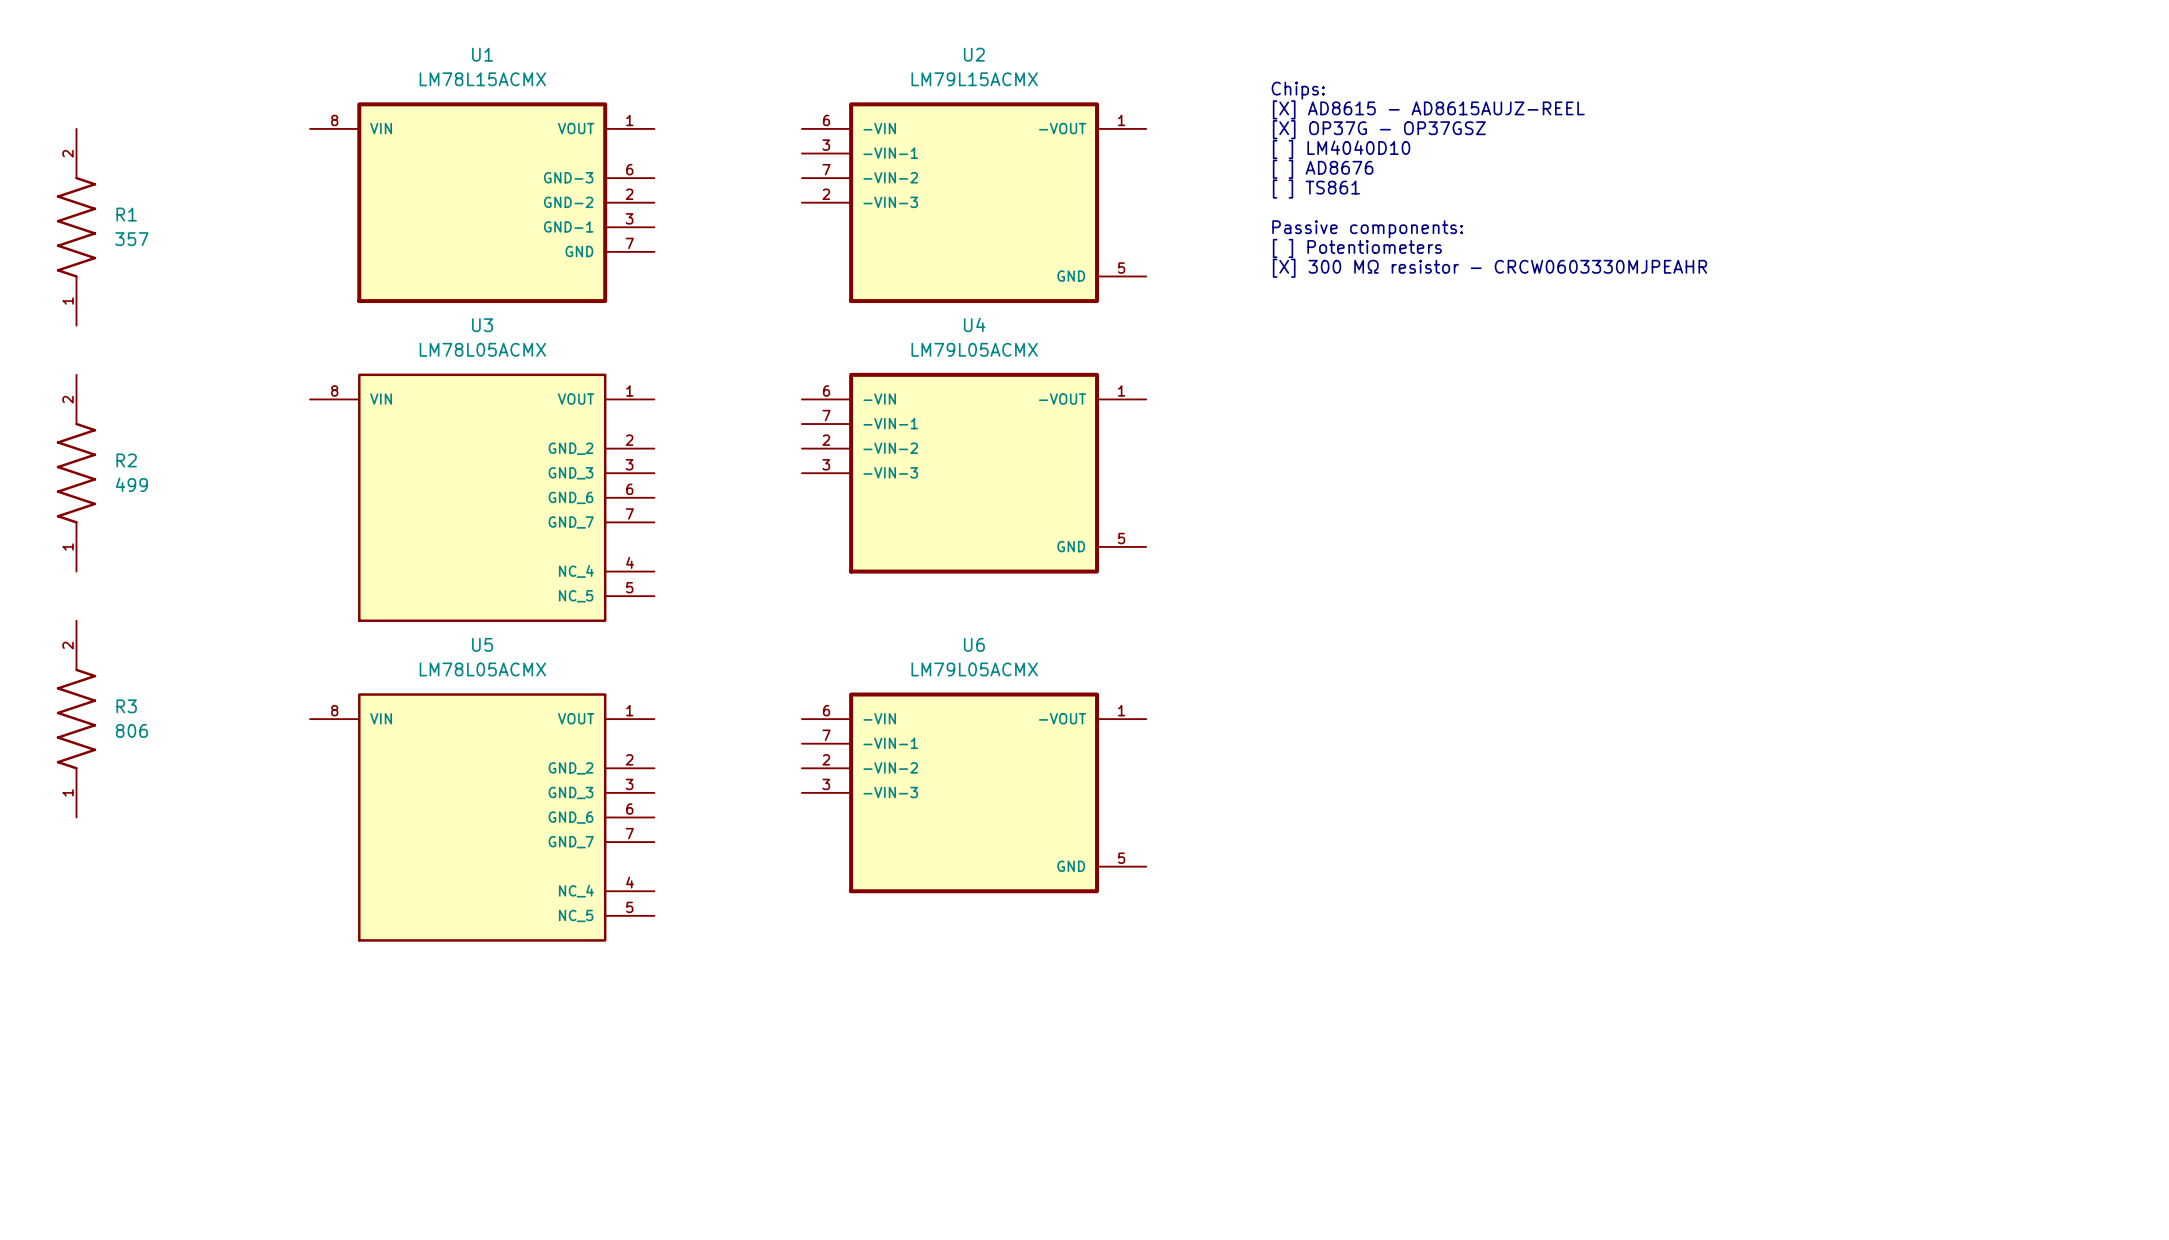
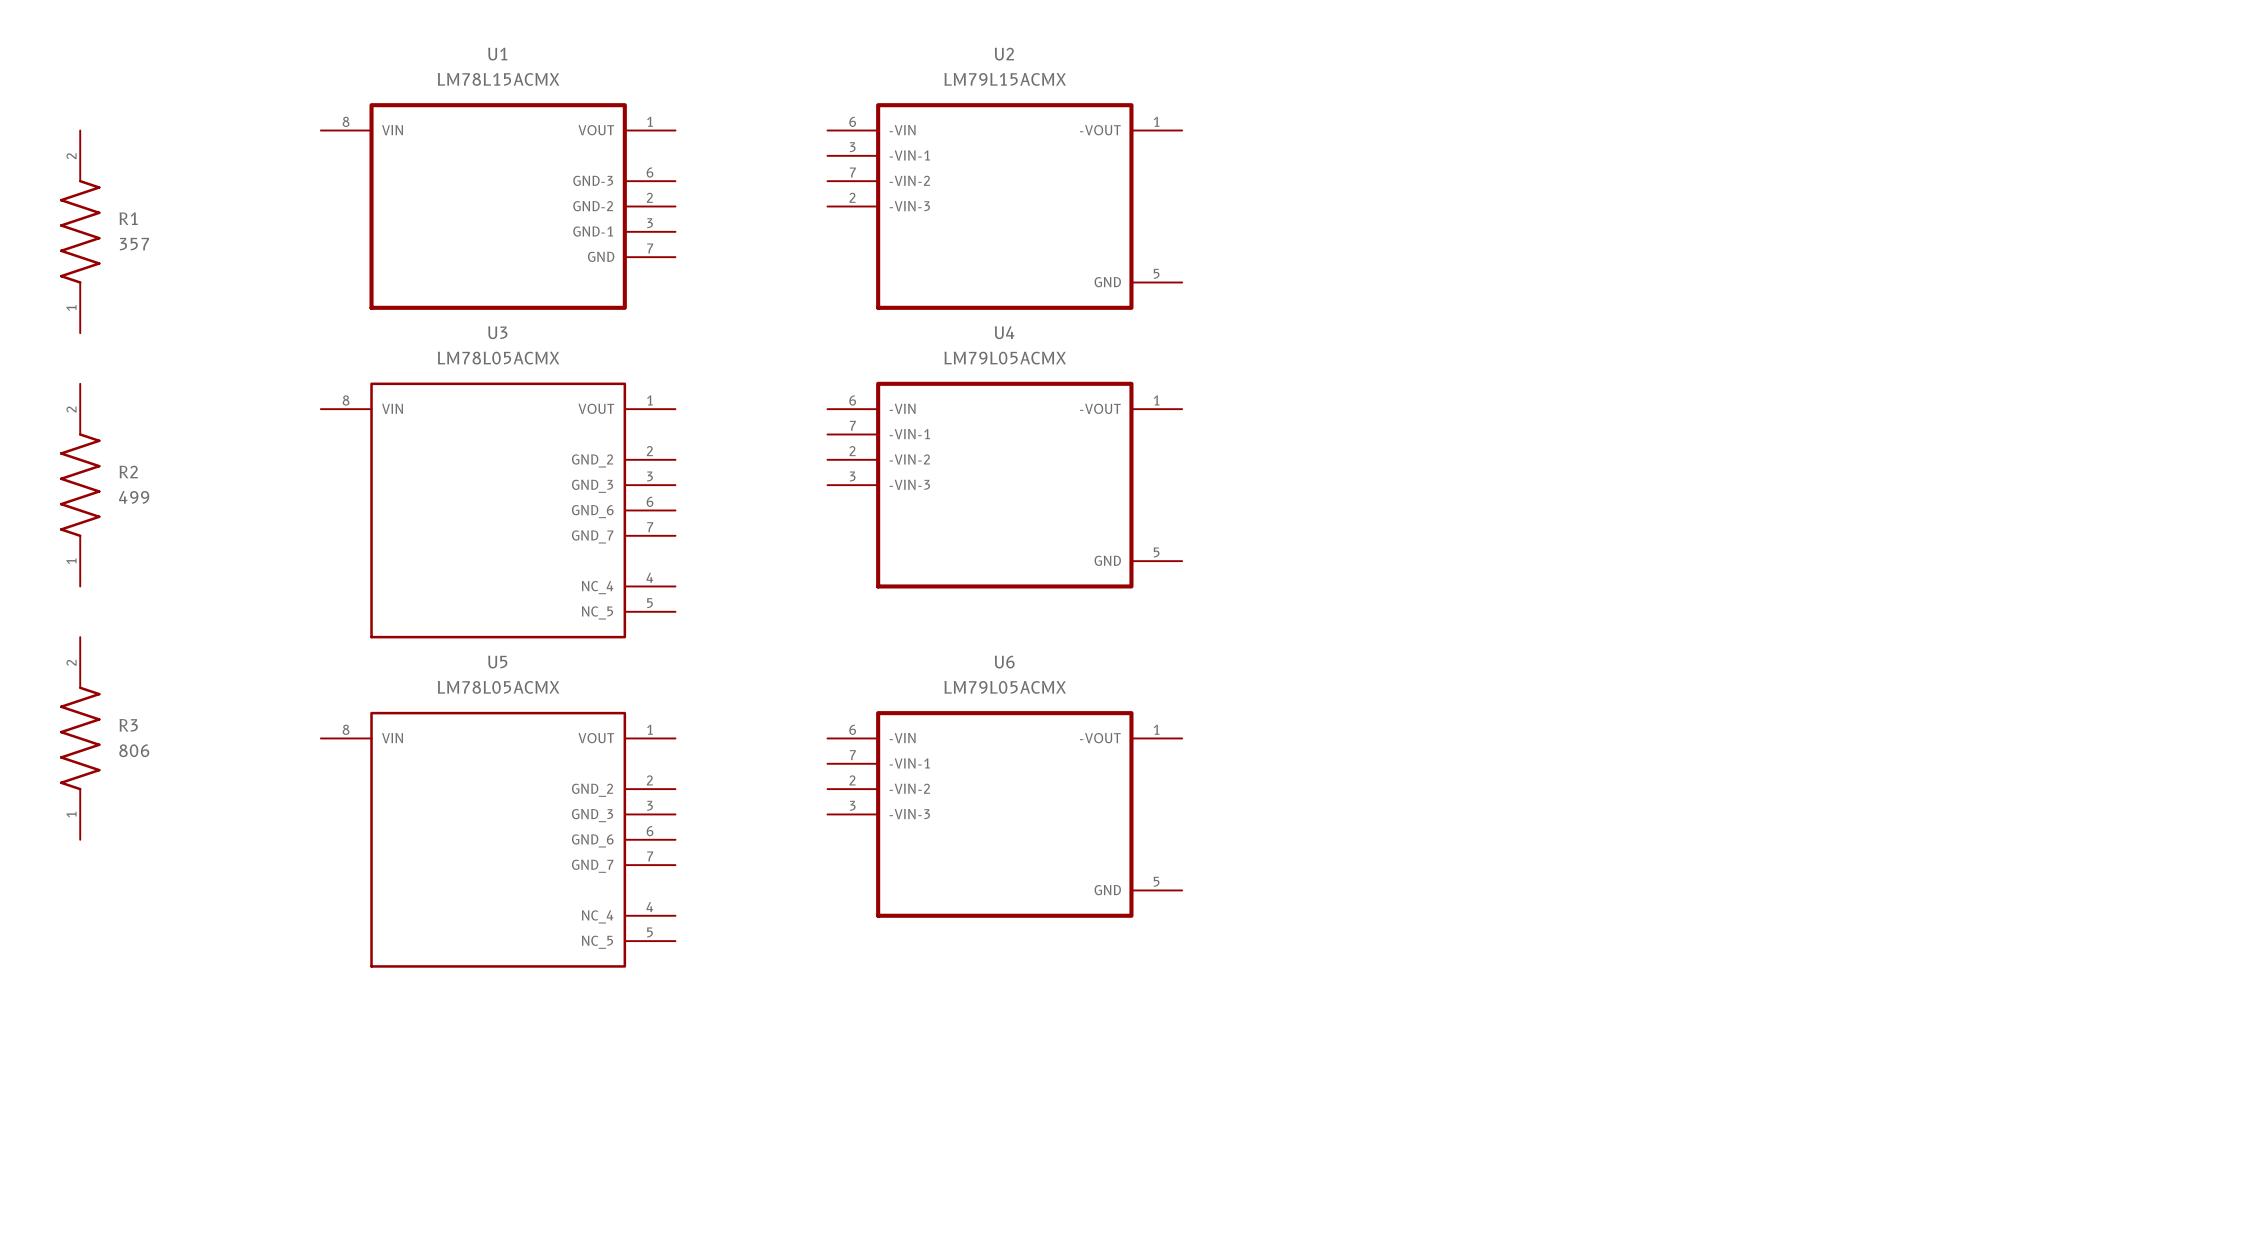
text: Chips: (1298, 90) -> none
text: [X] AD8615 - AD8615AUJZ-REEL (1428, 109) -> none
text: [X] OP37G - OP37GSZ (1379, 129) -> none
text: [ ] LM4040D10 (1341, 149) -> none
text: [ ] AD8676 (1323, 169) -> none
text: [ ] TS861 (1316, 189) -> none
text: Passive components: (1367, 229) -> none
text: [ ] Potentiometers (1357, 248) -> none
text: [X] 300 MΩ resistor - CRCW0603330MJPEAHR (1489, 268) -> none

